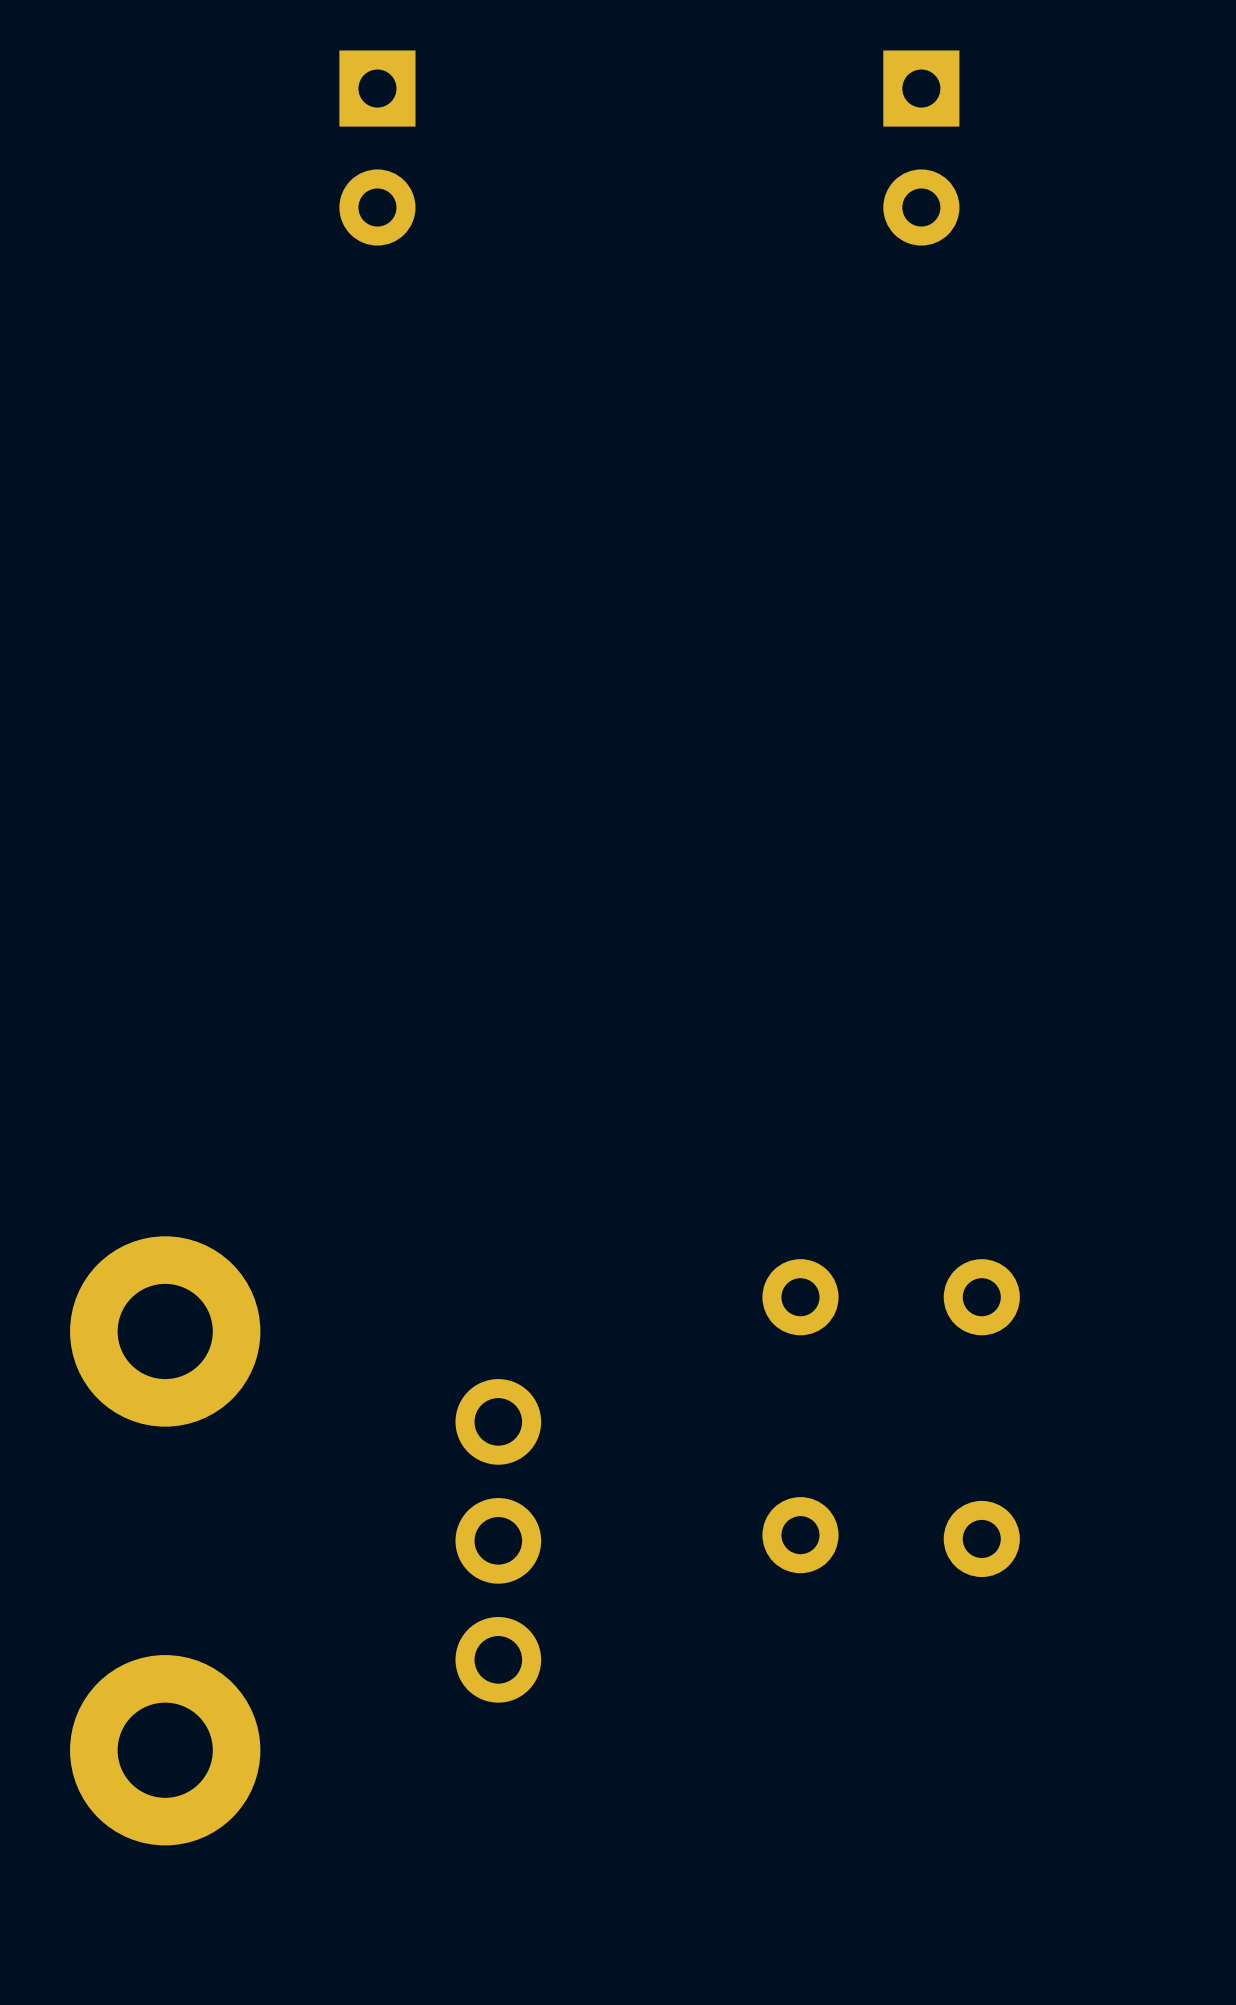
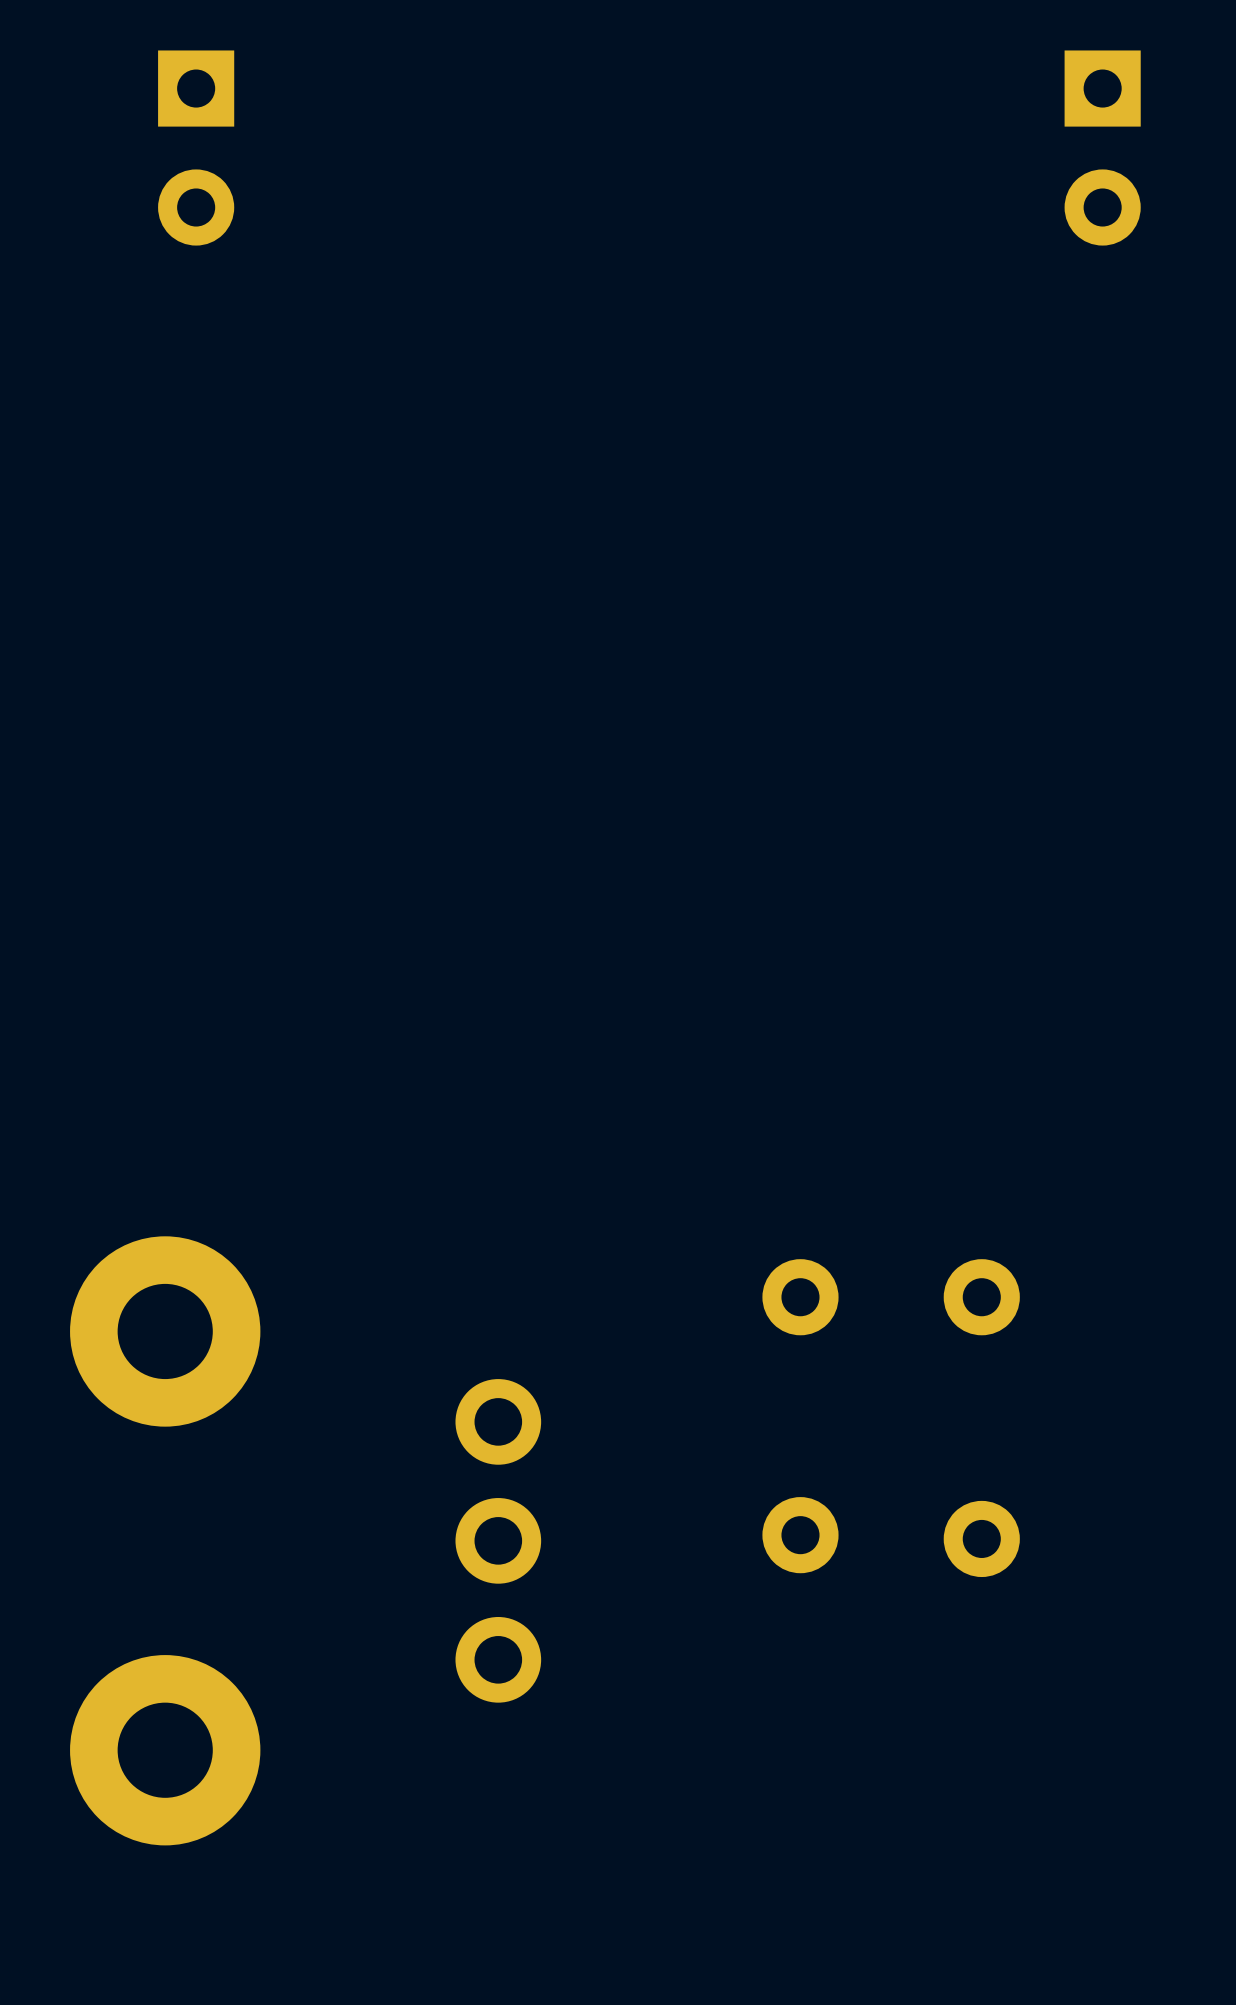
part position: (377, 148) -> (196, 148)
part position: (921, 148) -> (1102, 148)

